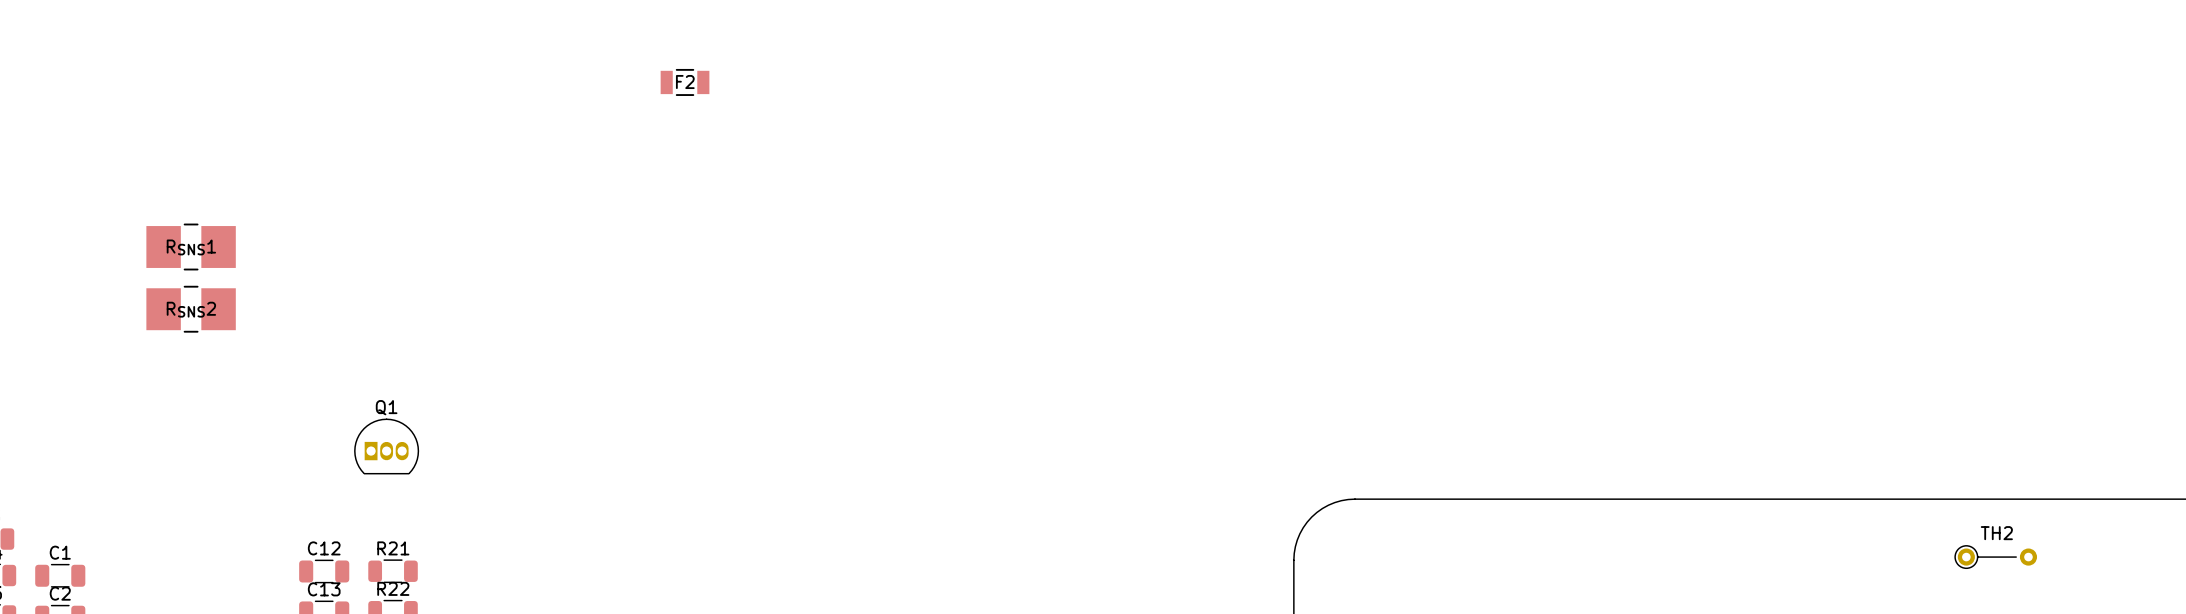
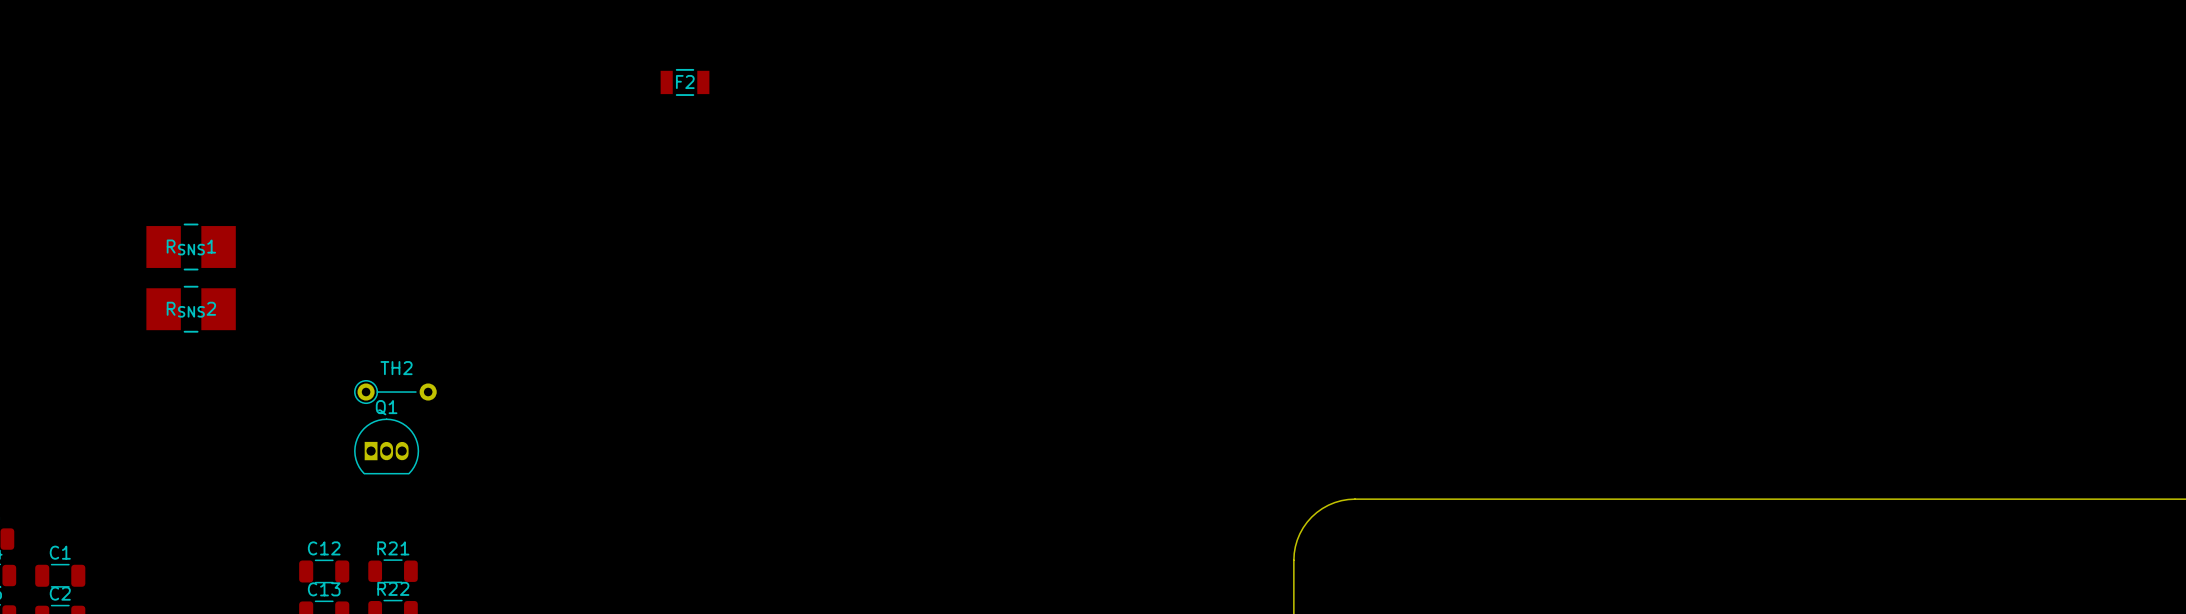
TH2 position: (1995, 557) -> (395, 392)

